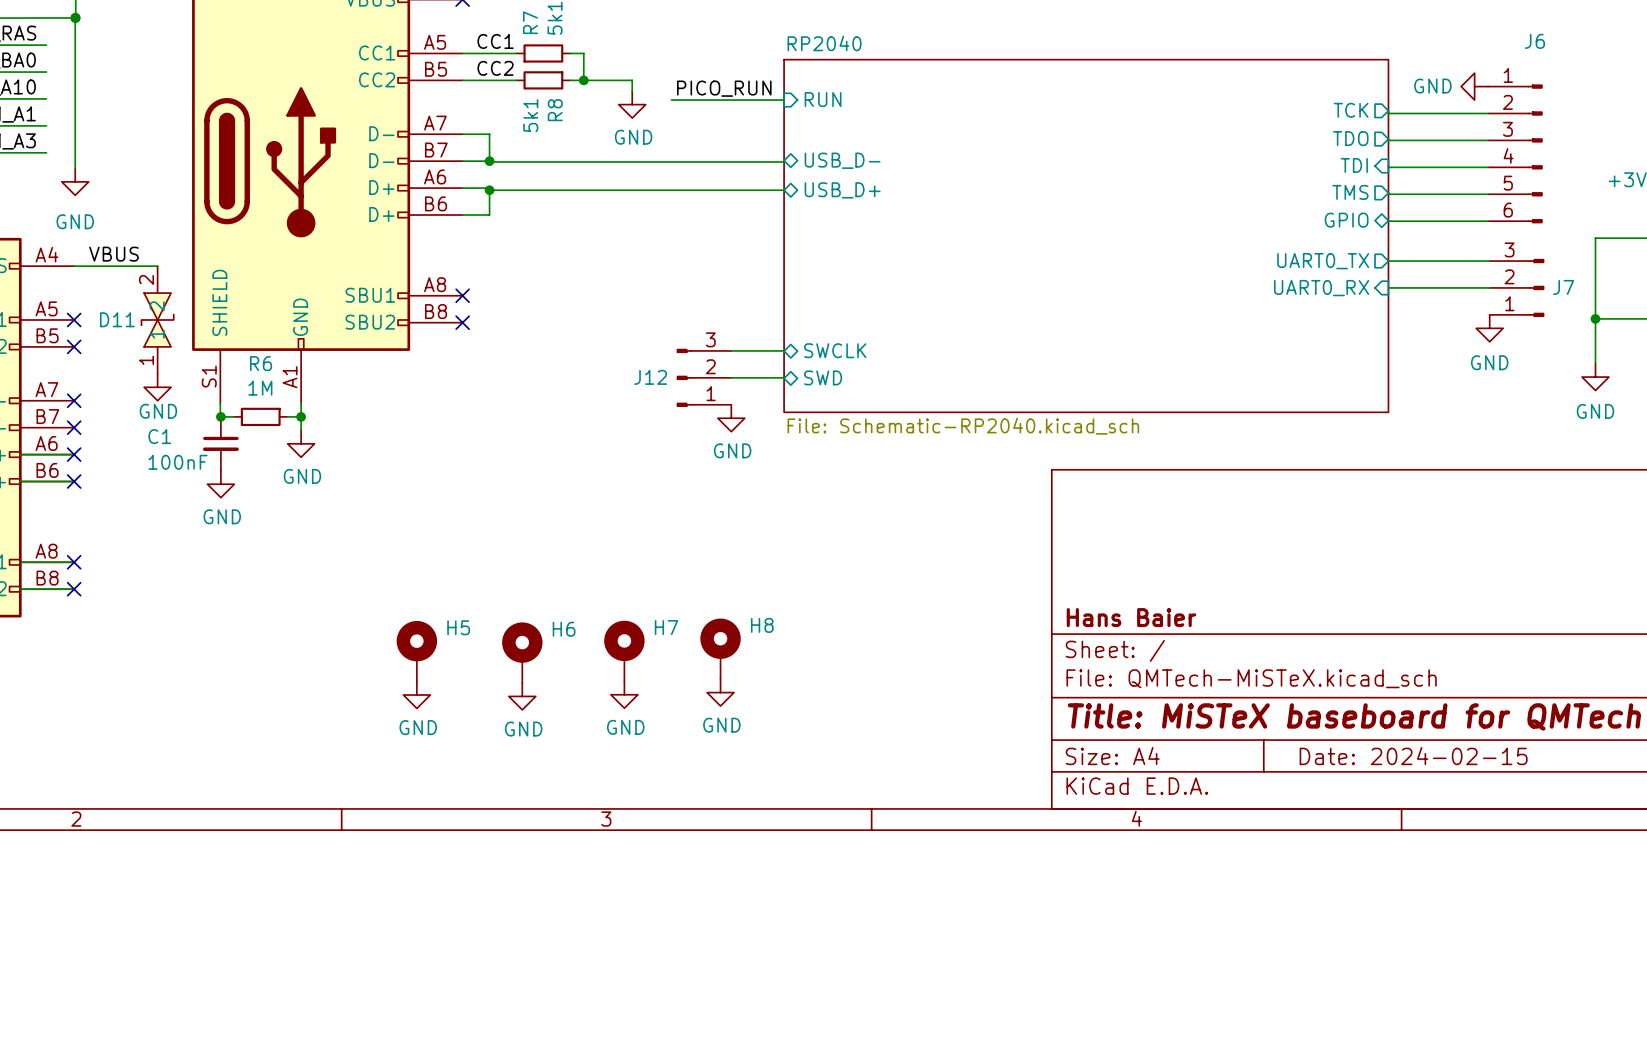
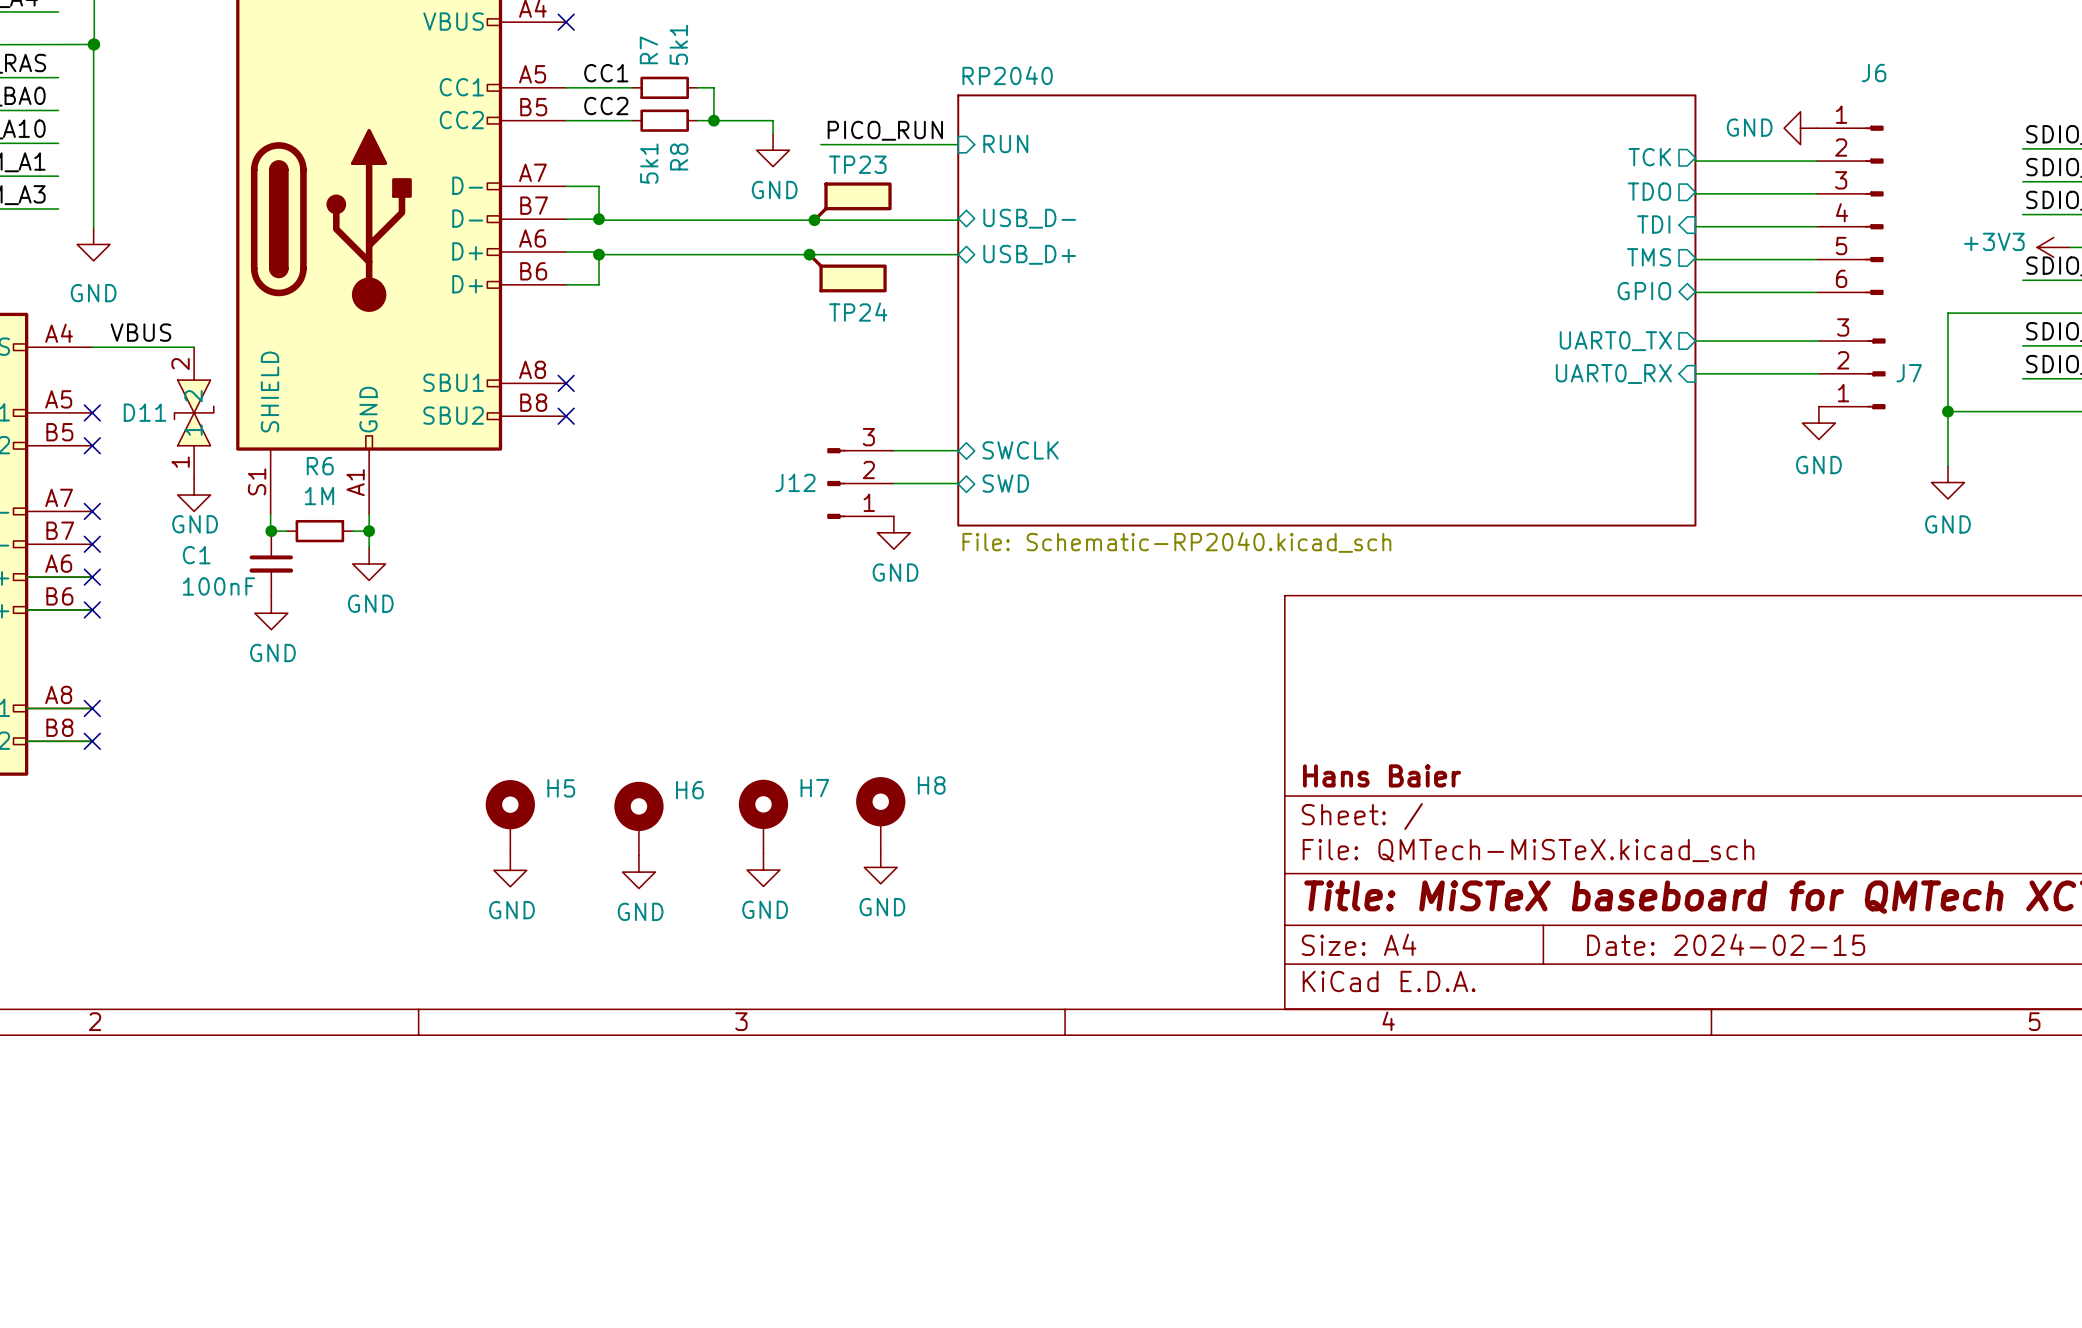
TP23: none -> (852, 202)
junction: none -> (814, 220)
junction: none -> (809, 254)
TP24: none -> (847, 272)

